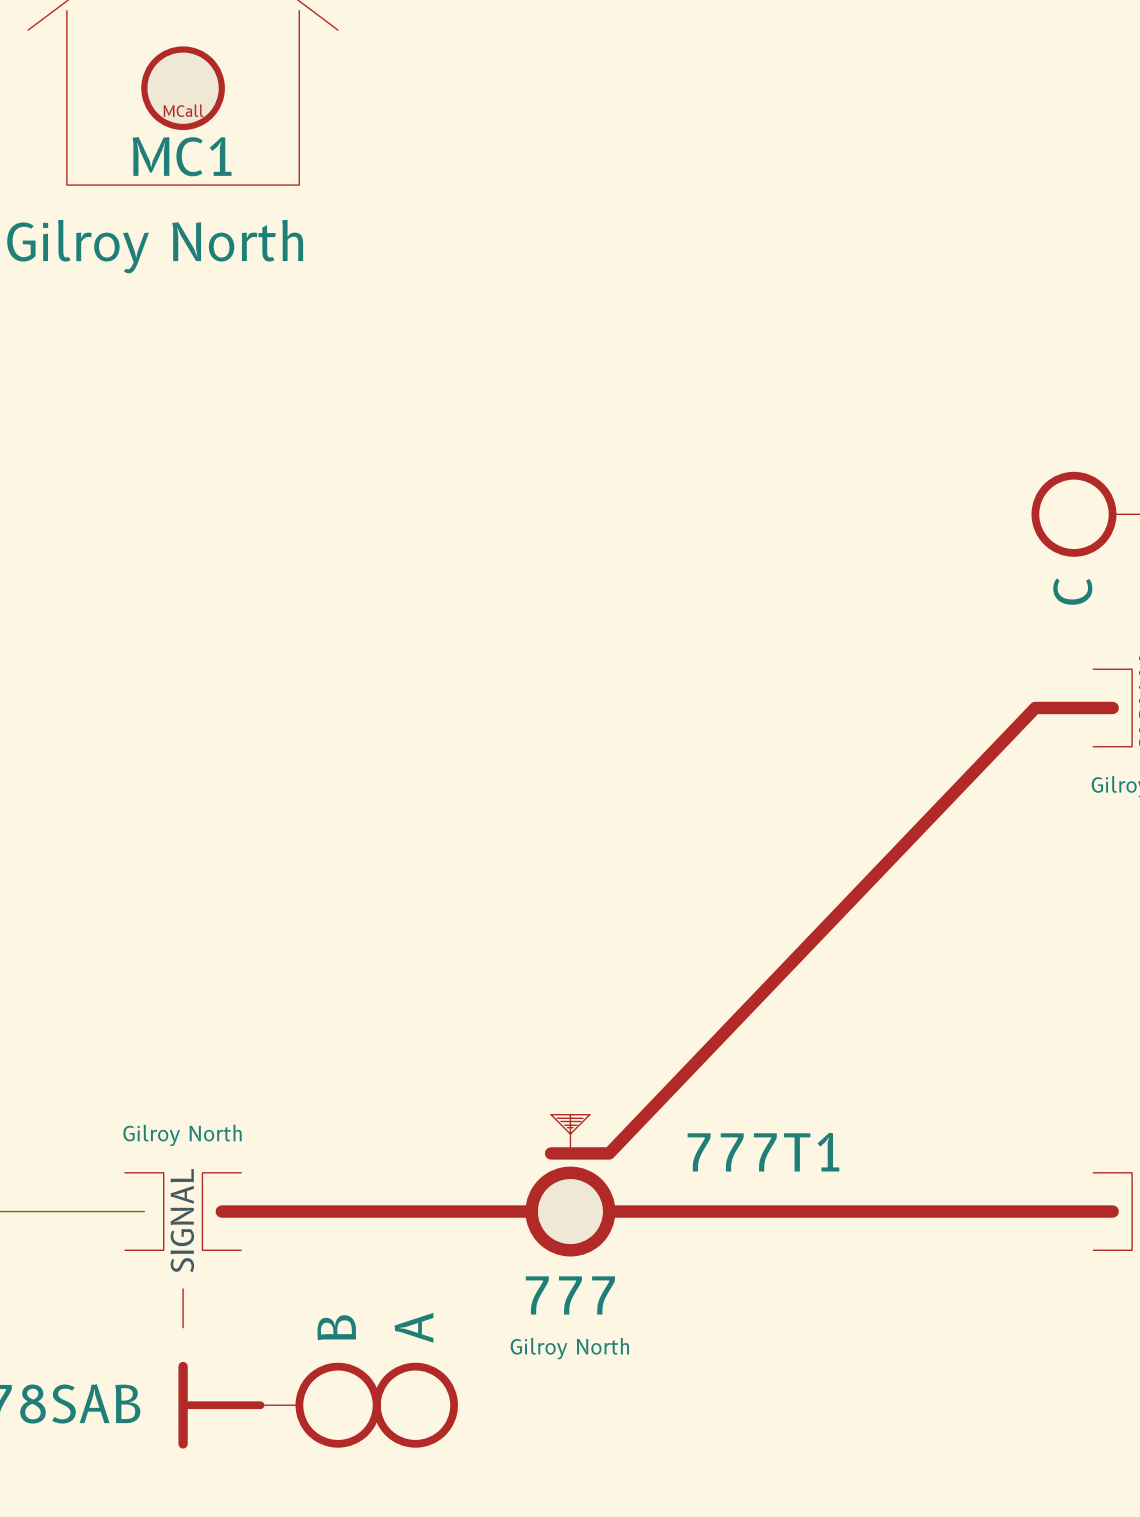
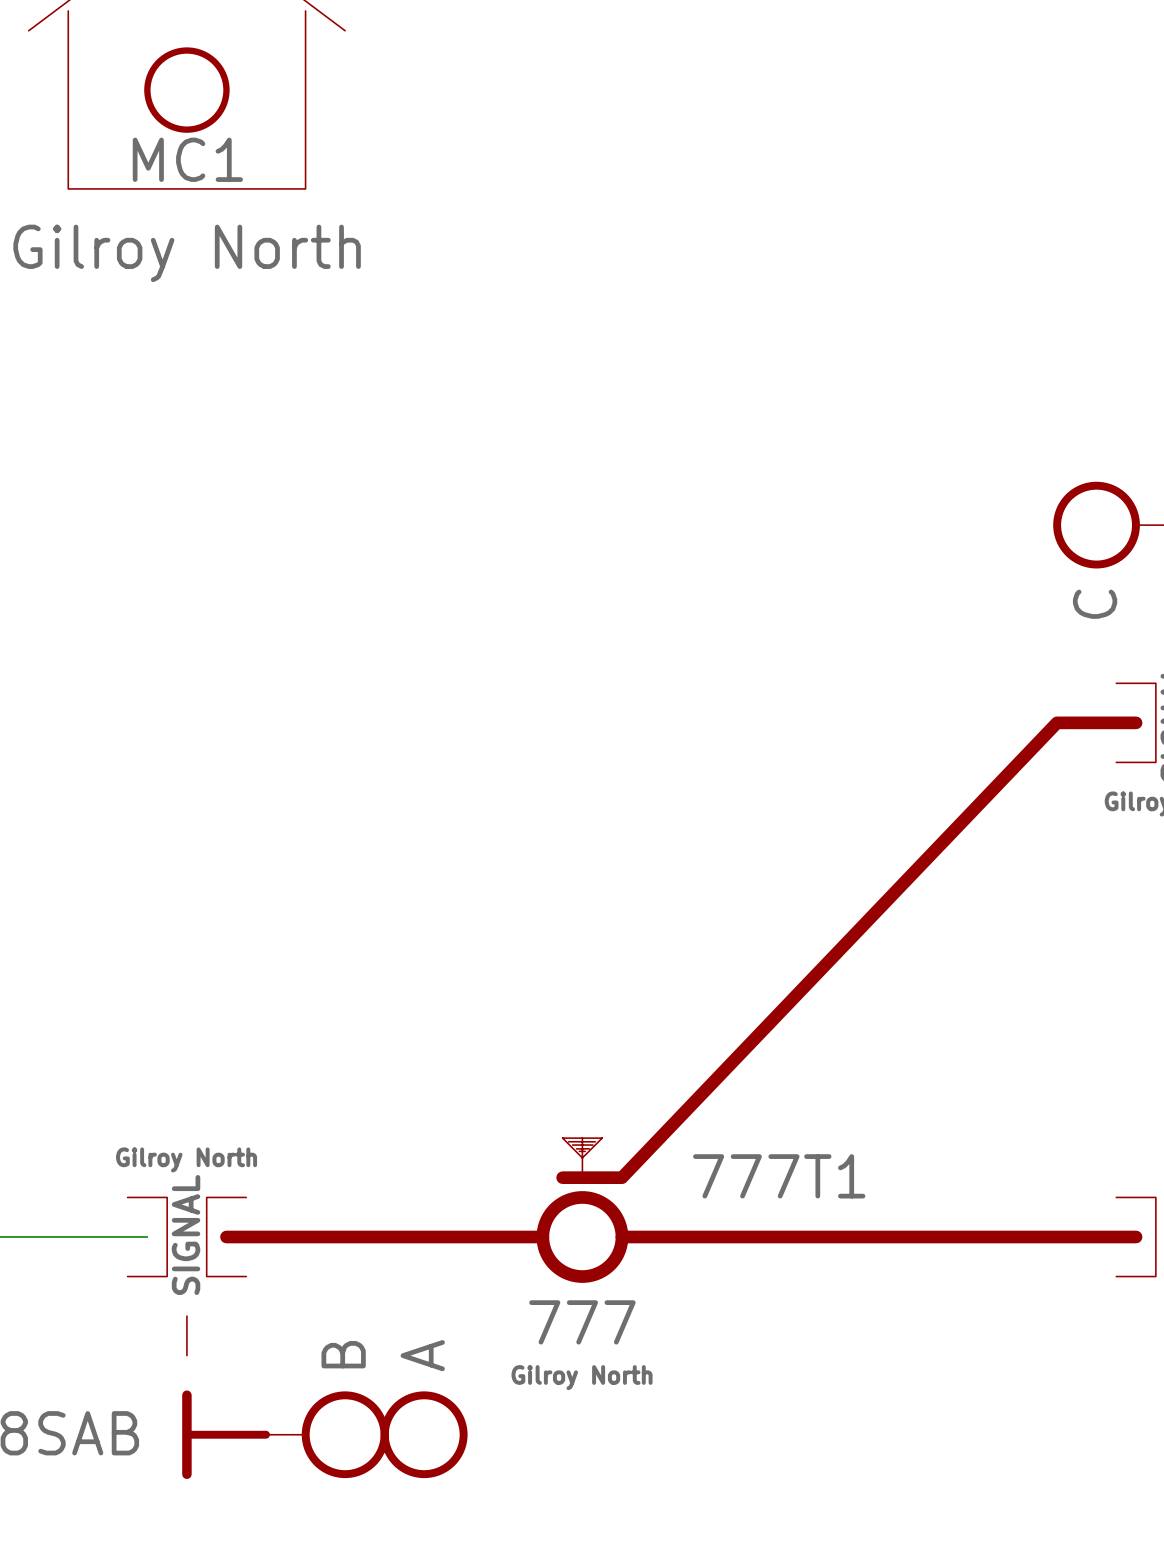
part text: MCall (183, 110) -> none

